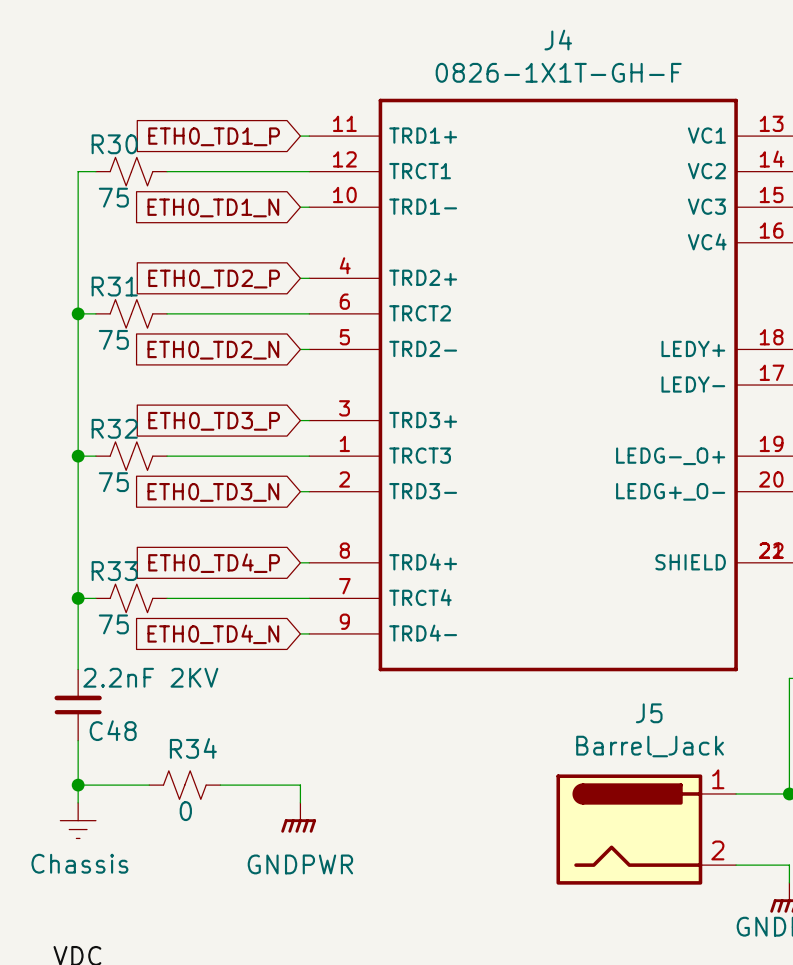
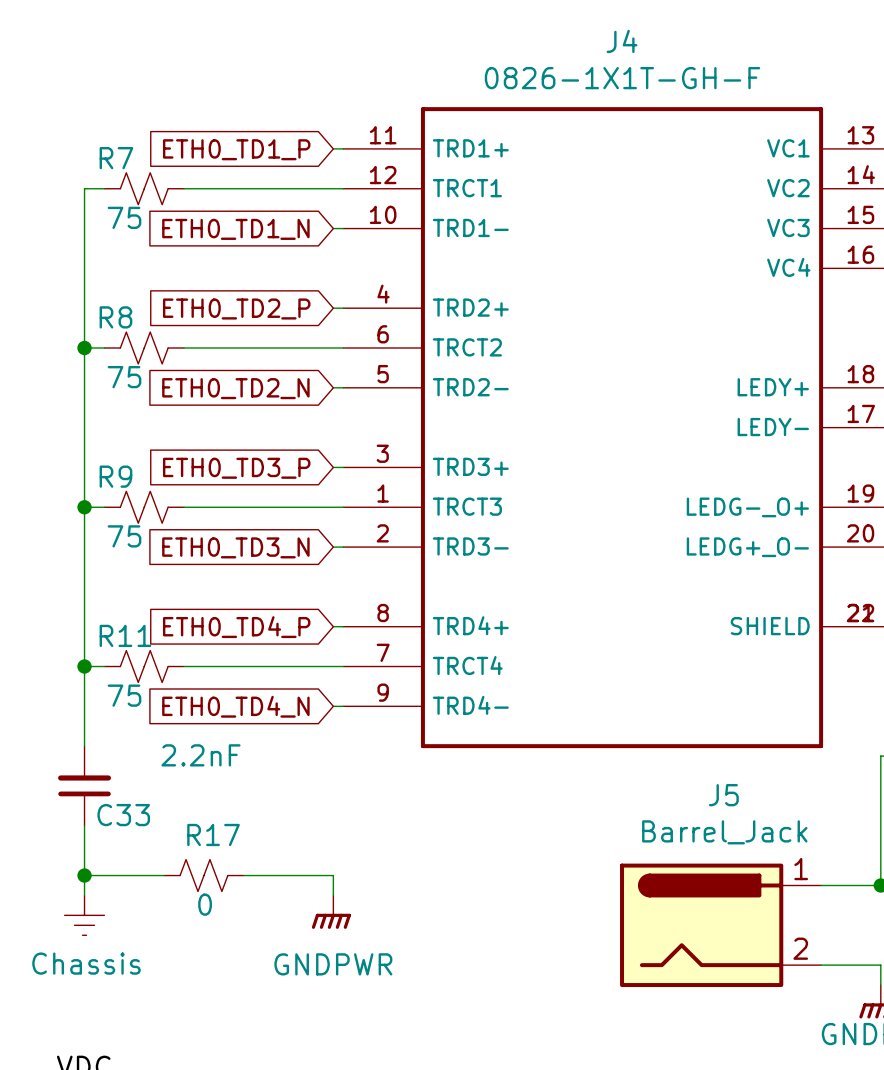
R30 name: R30 (114, 144) -> R7 (116, 158)
R31 name: R31 (114, 286) -> R8 (115, 317)
R32 name: R32 (114, 428) -> R9 (115, 476)
R33 name: R33 (114, 571) -> R11 (125, 635)
C48 value: 2.2nF 2KV (150, 677) -> 2.2nF (200, 755)
C48 name: C48 (113, 730) -> C33 (123, 815)
R34 name: R34 (193, 748) -> R17 (213, 834)

